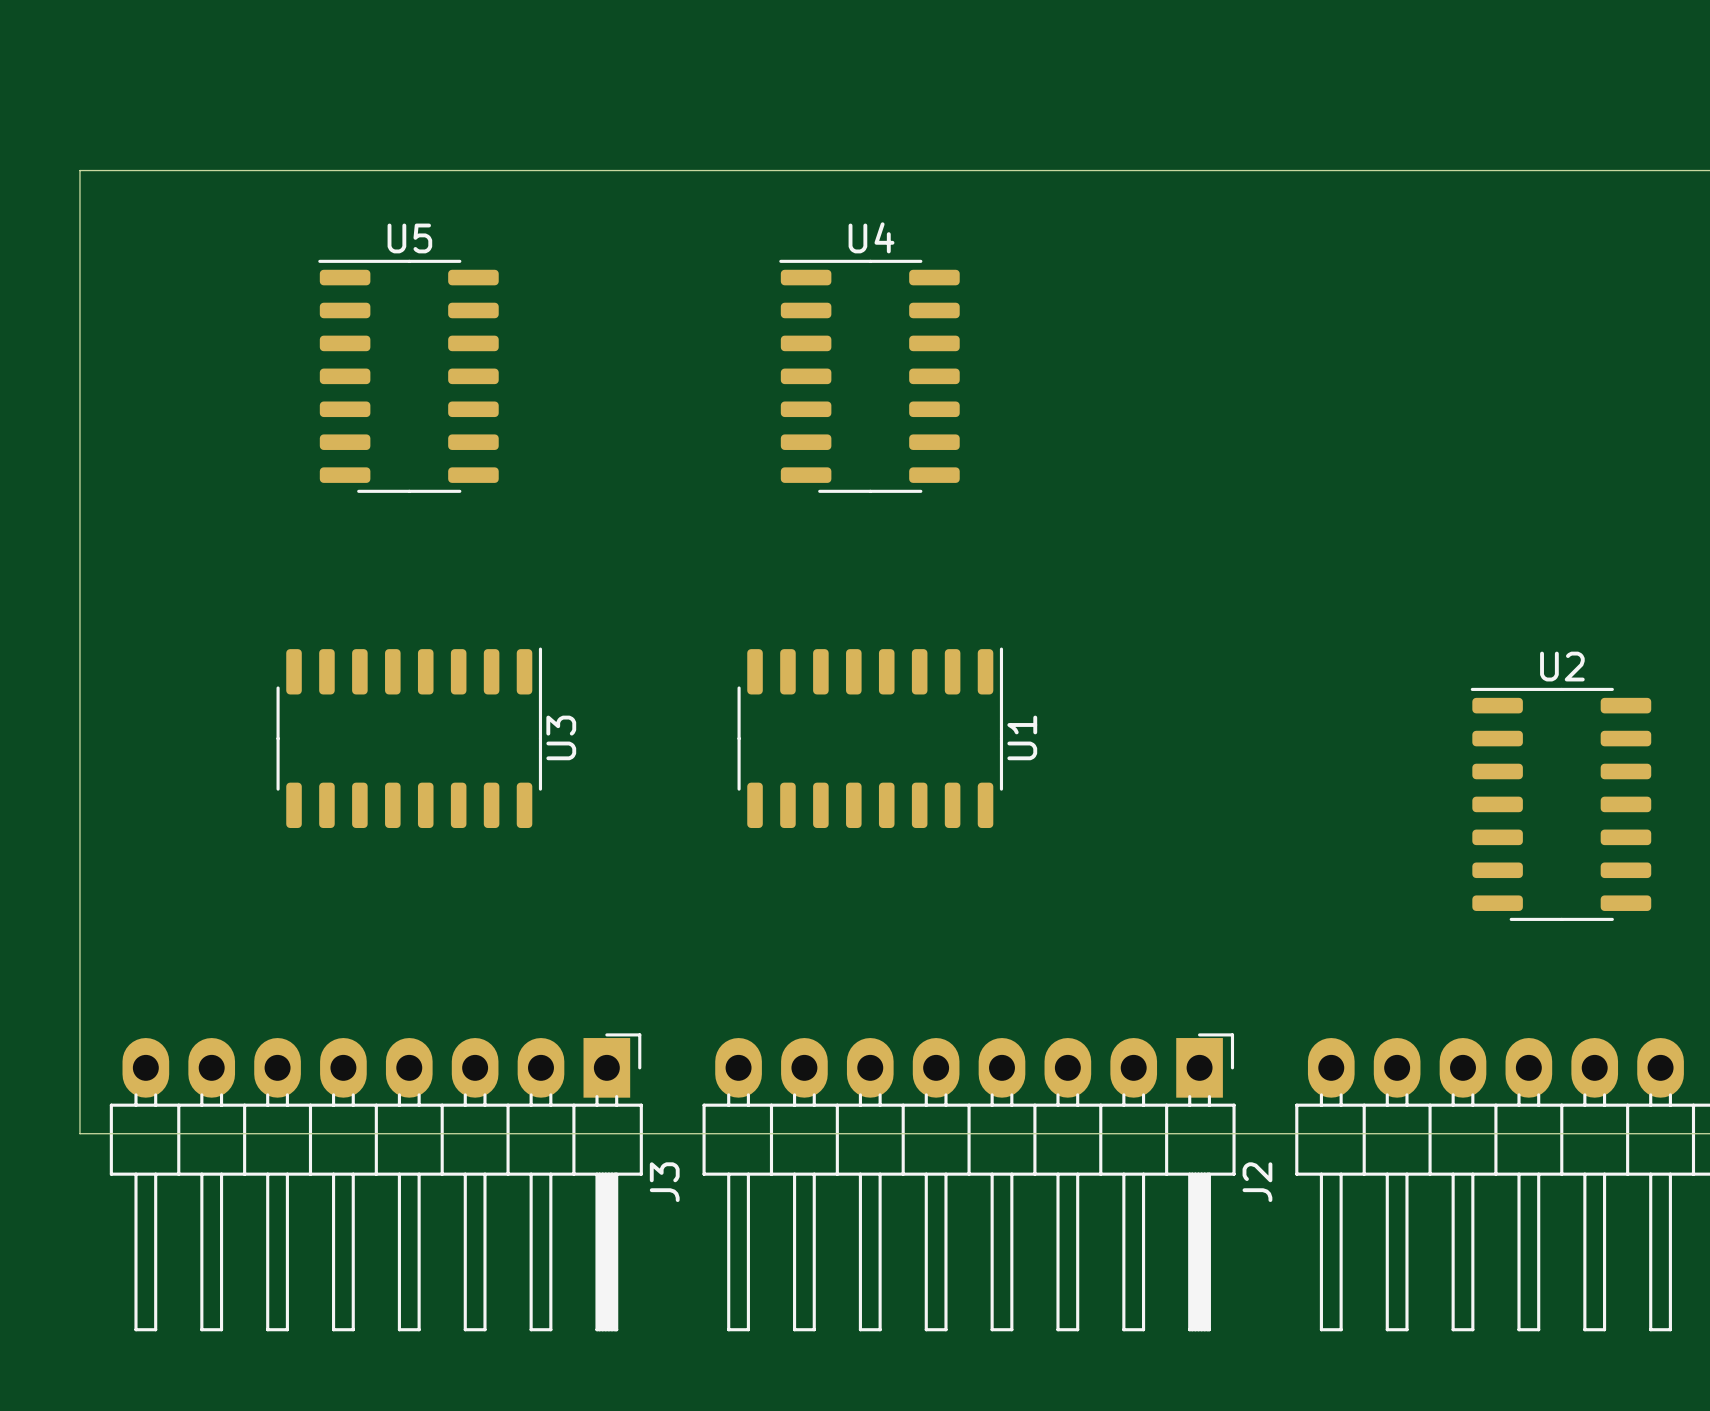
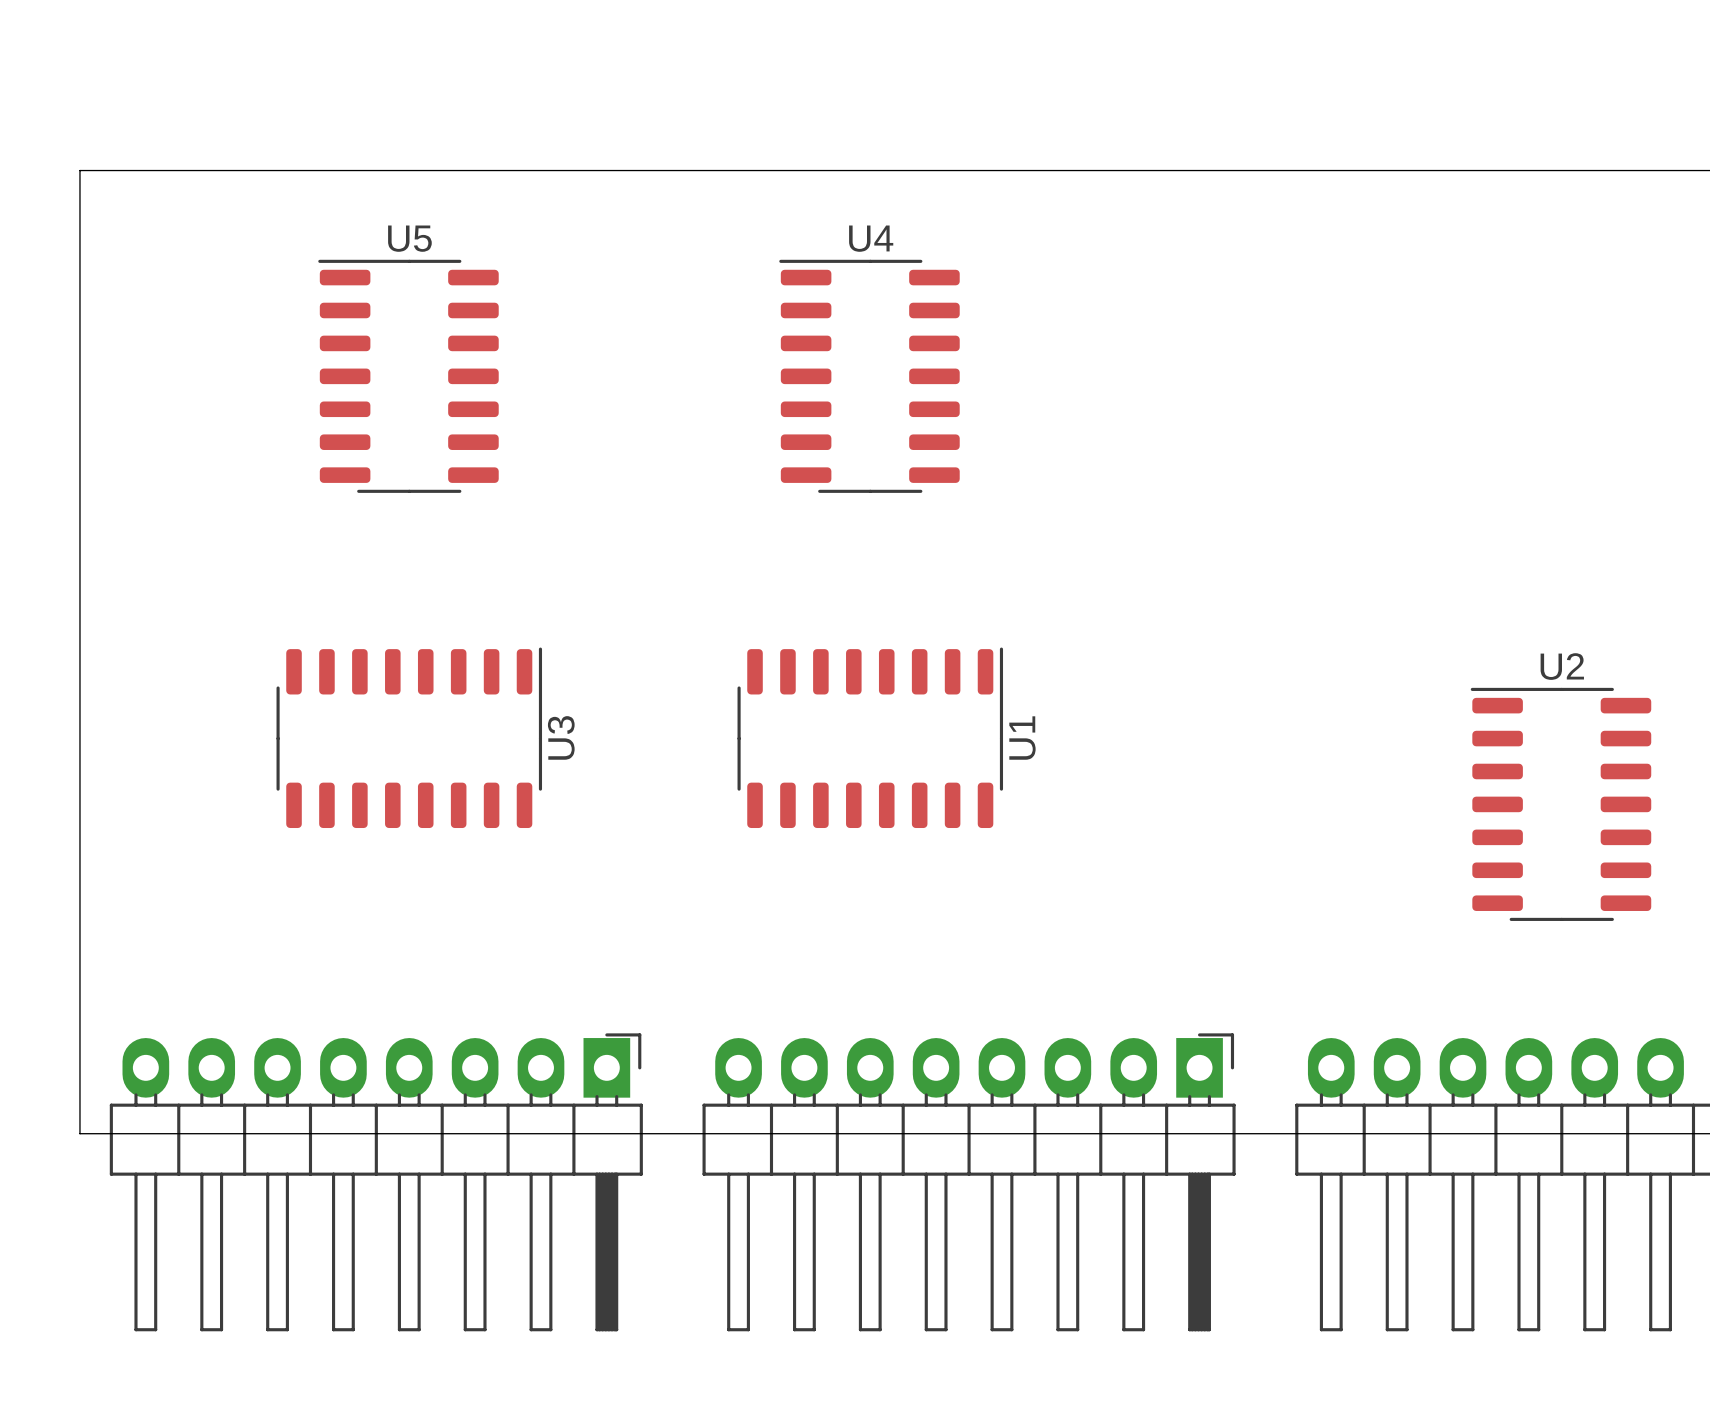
J3 name: J3 (664, 1182) -> none
J2 name: J2 (1257, 1182) -> none

